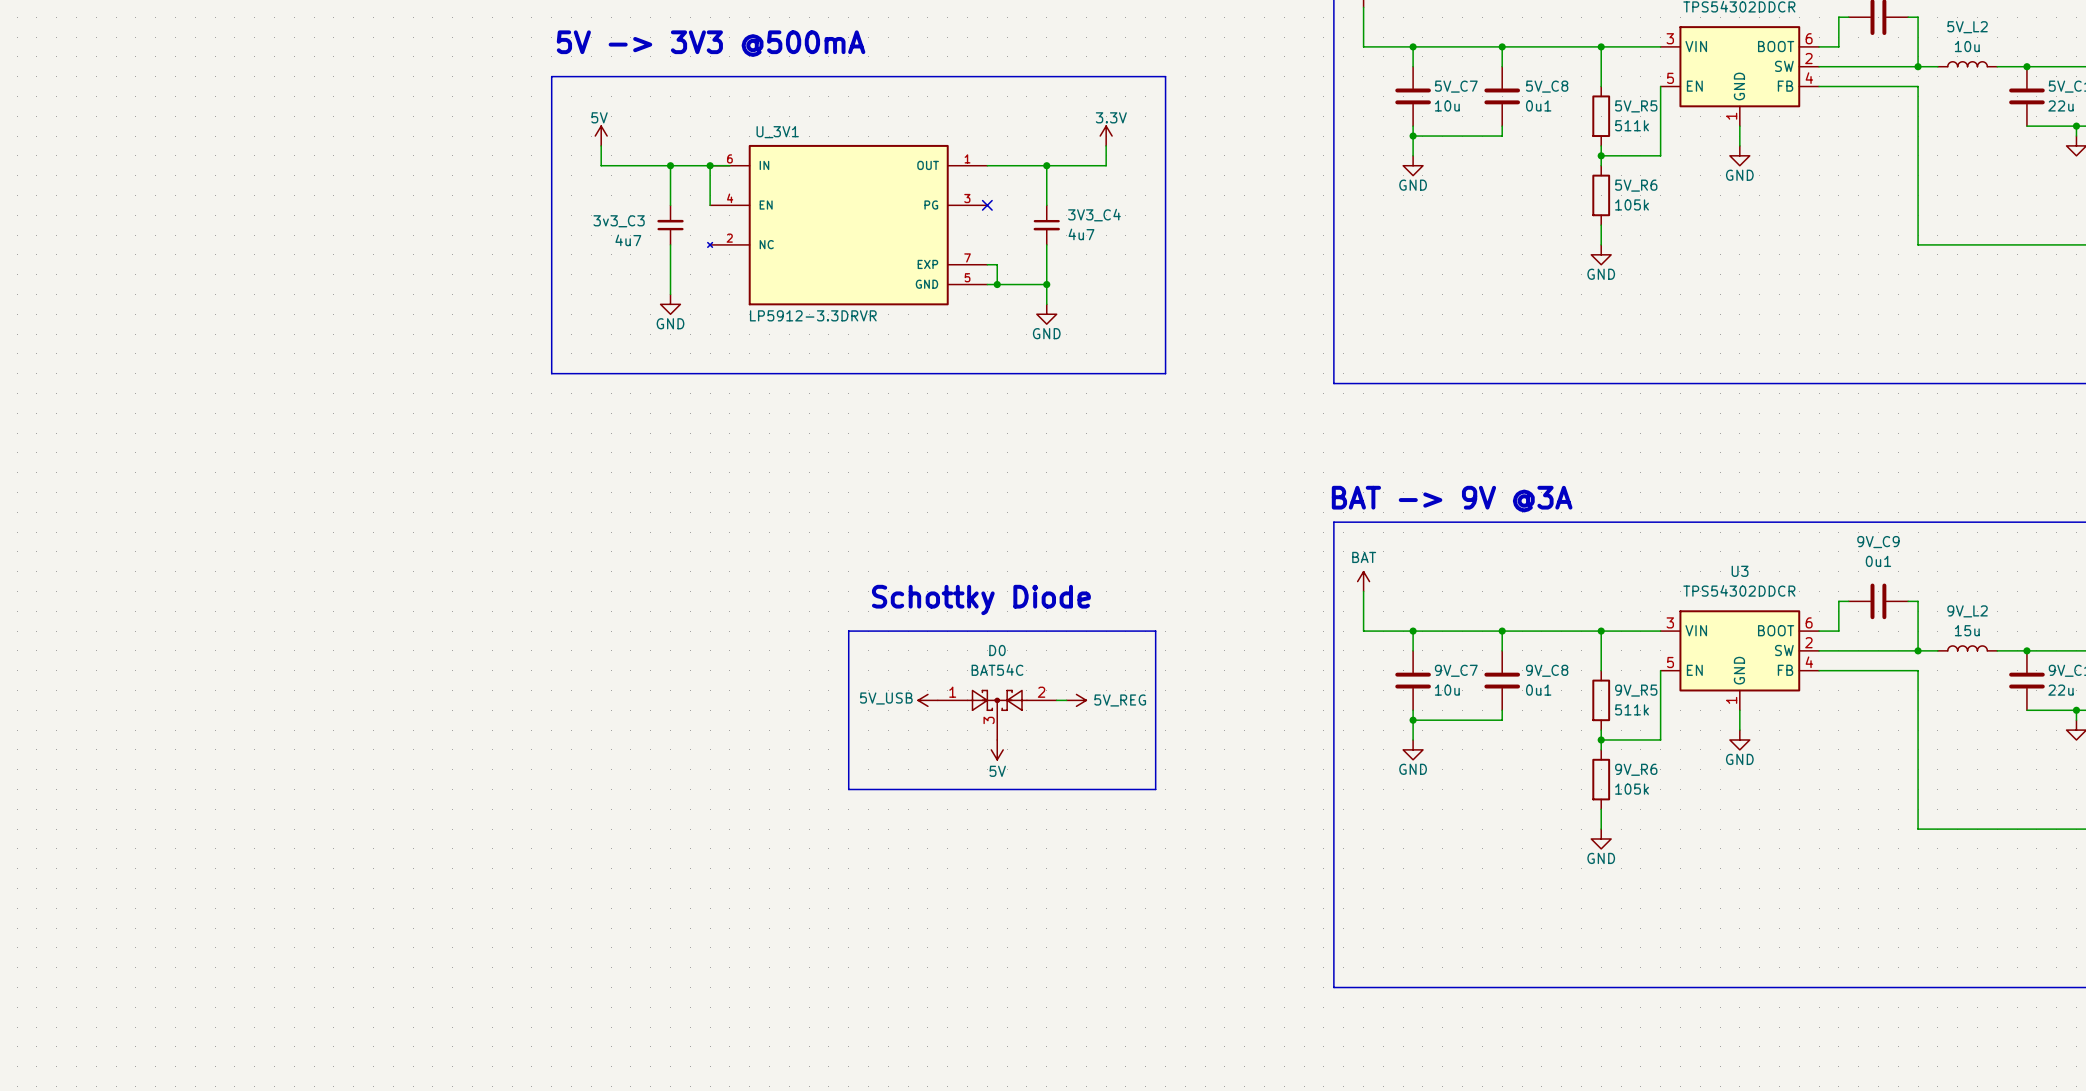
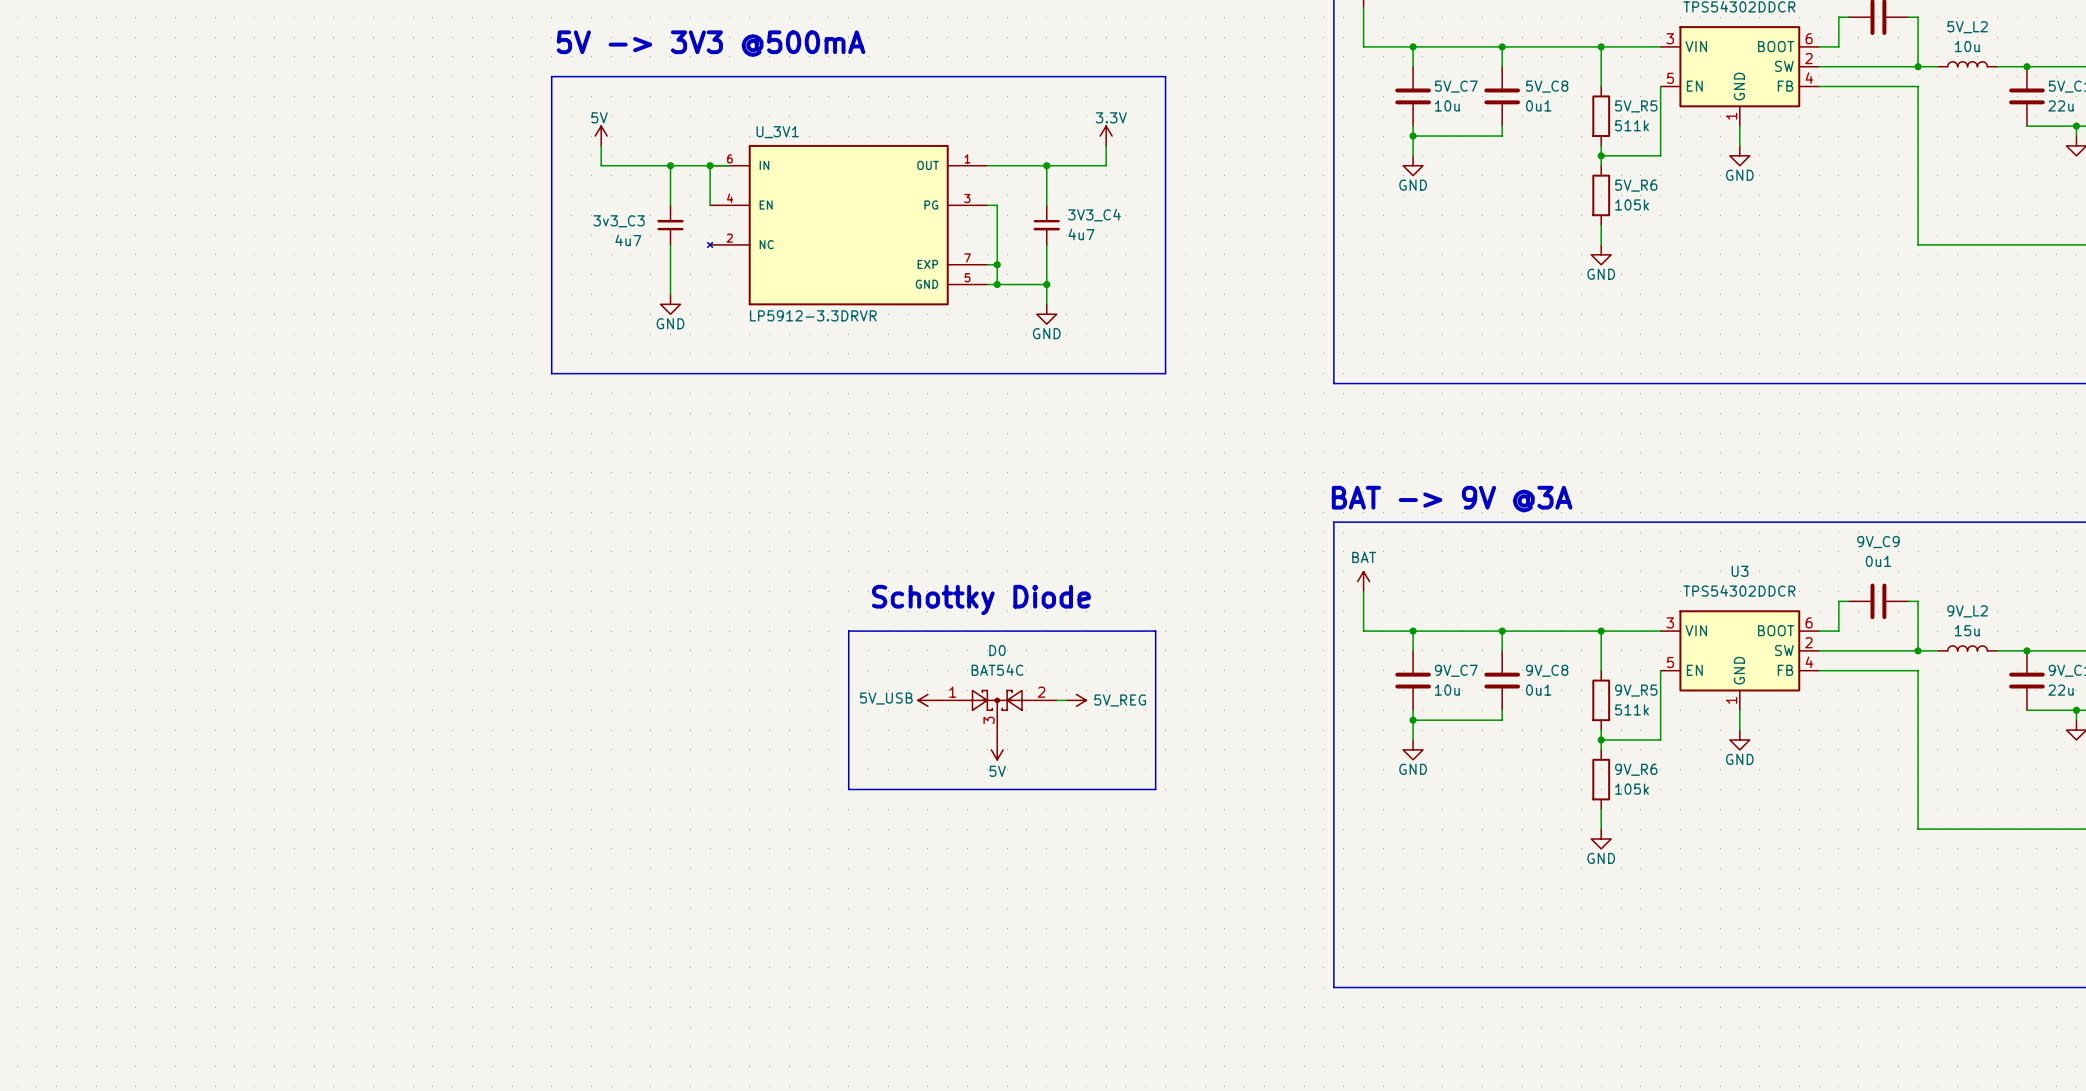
wire: none -> (987, 205) (997, 205) (997, 264)
no-connect mark: (987, 205) -> none
junction: none -> (997, 264)

